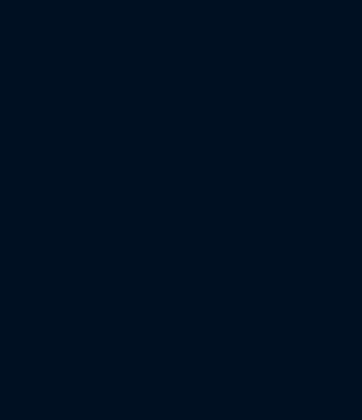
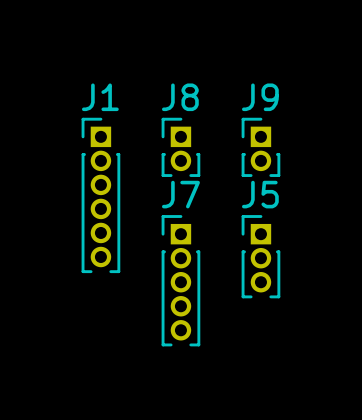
J8: none -> (180, 147)
J9: none -> (260, 147)
J1: none -> (100, 195)
J5: none -> (260, 256)
J7: none -> (180, 280)

